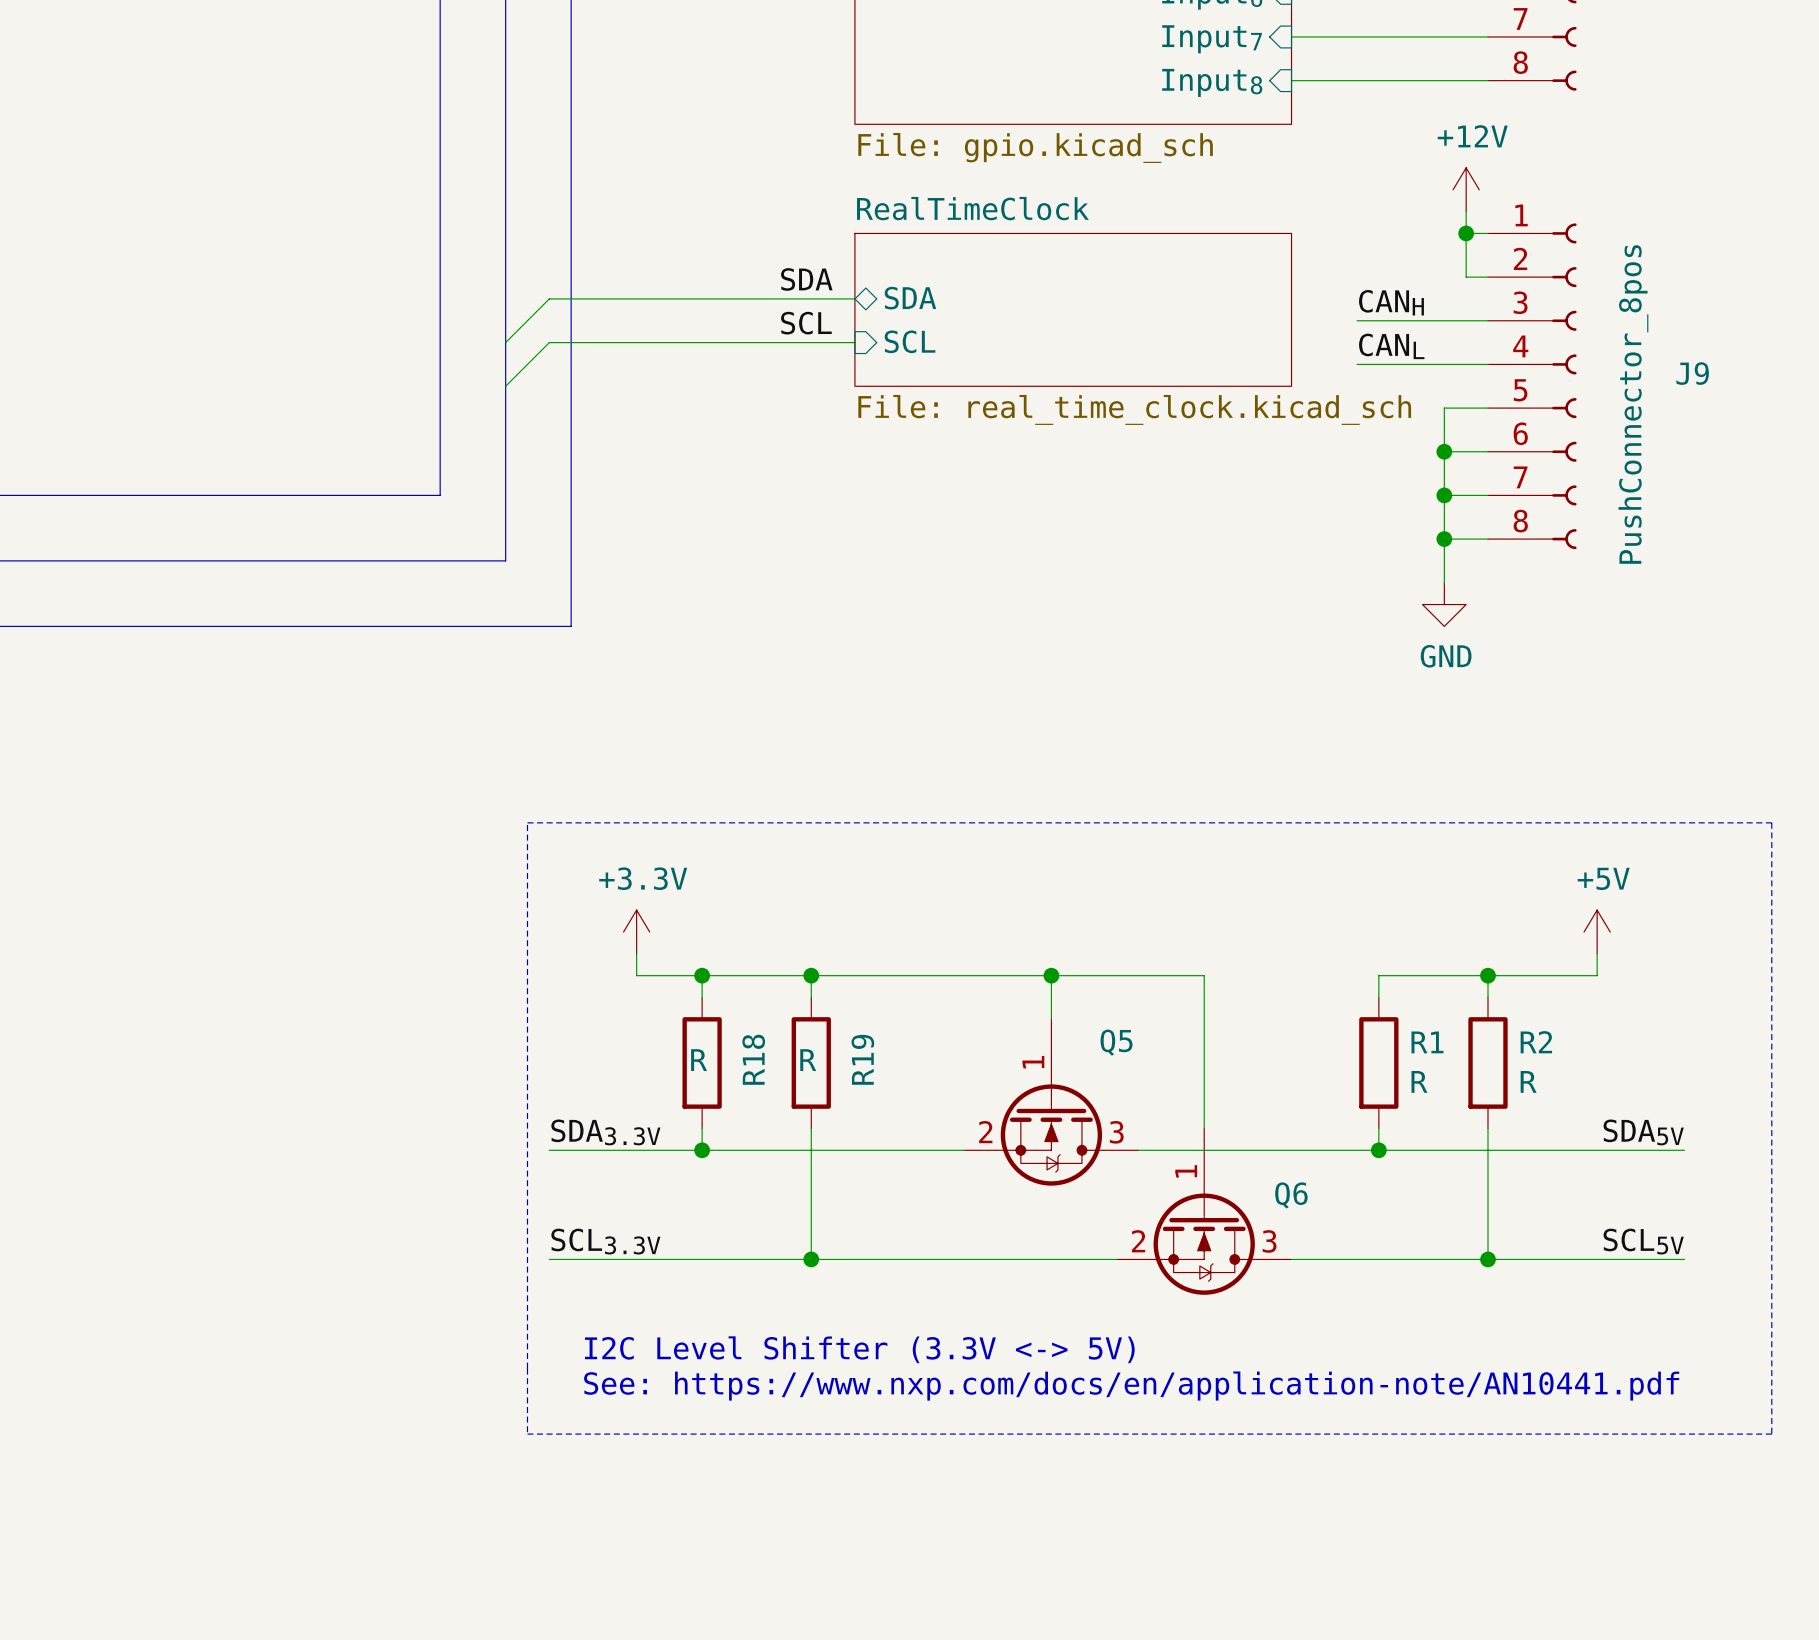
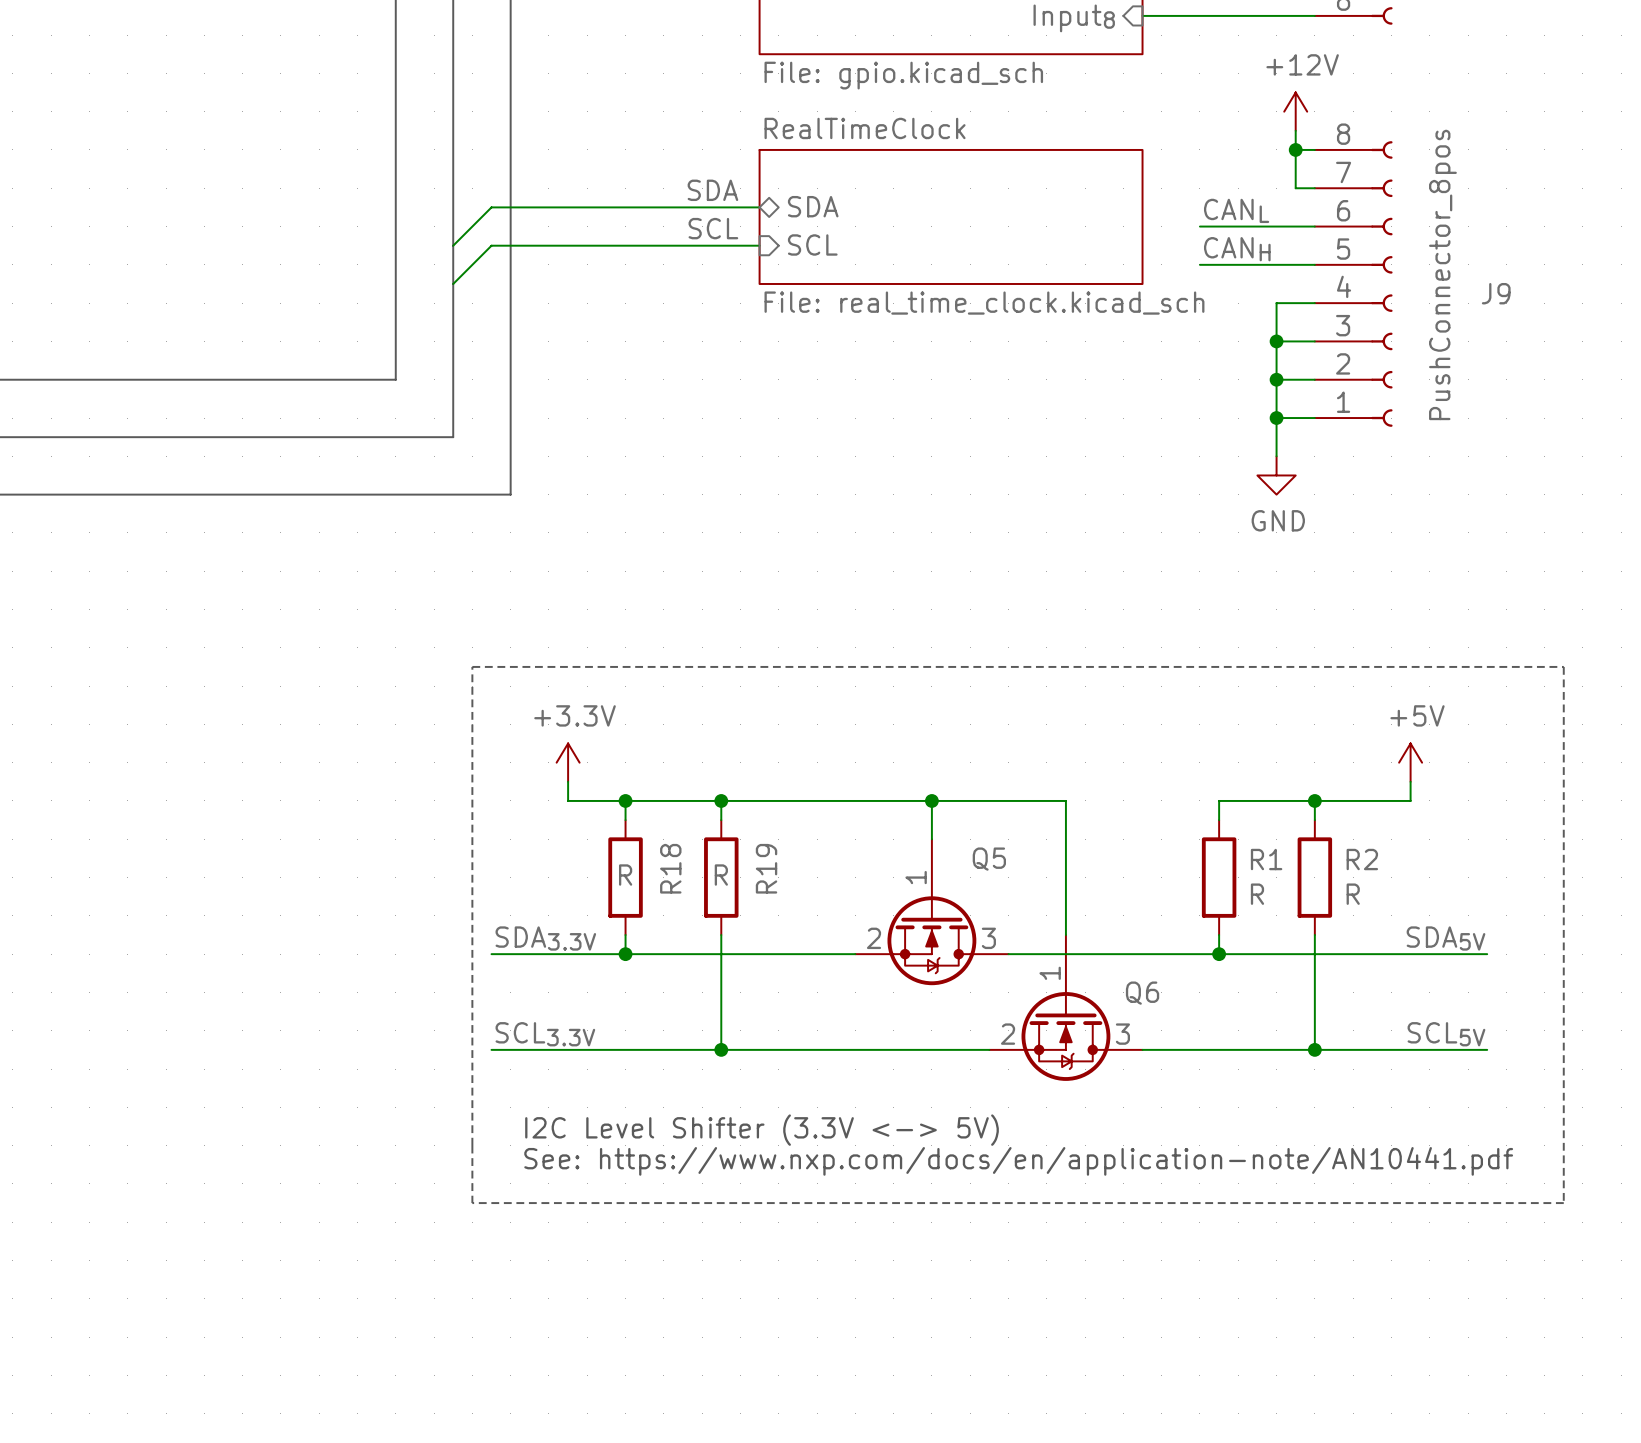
label: CANH (1391, 302) -> CANL (1236, 210)
label: CANL (1391, 346) -> CANH (1237, 249)
J9 flip: as is (1564, 386) -> up-down (1381, 283)

